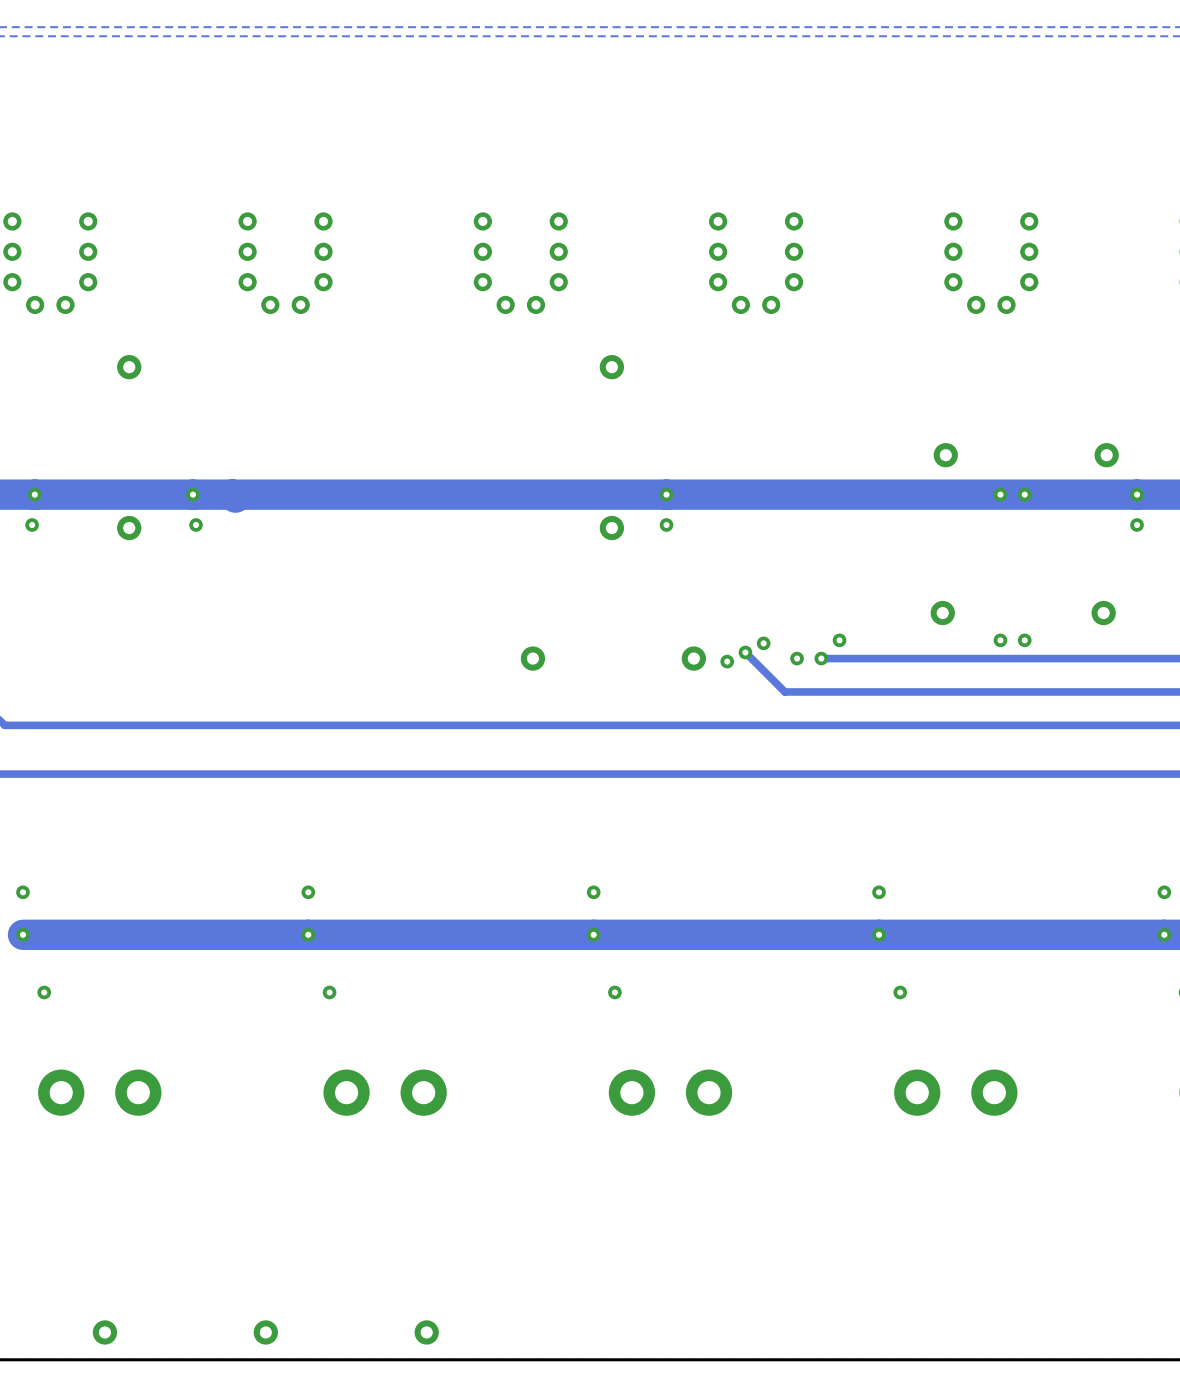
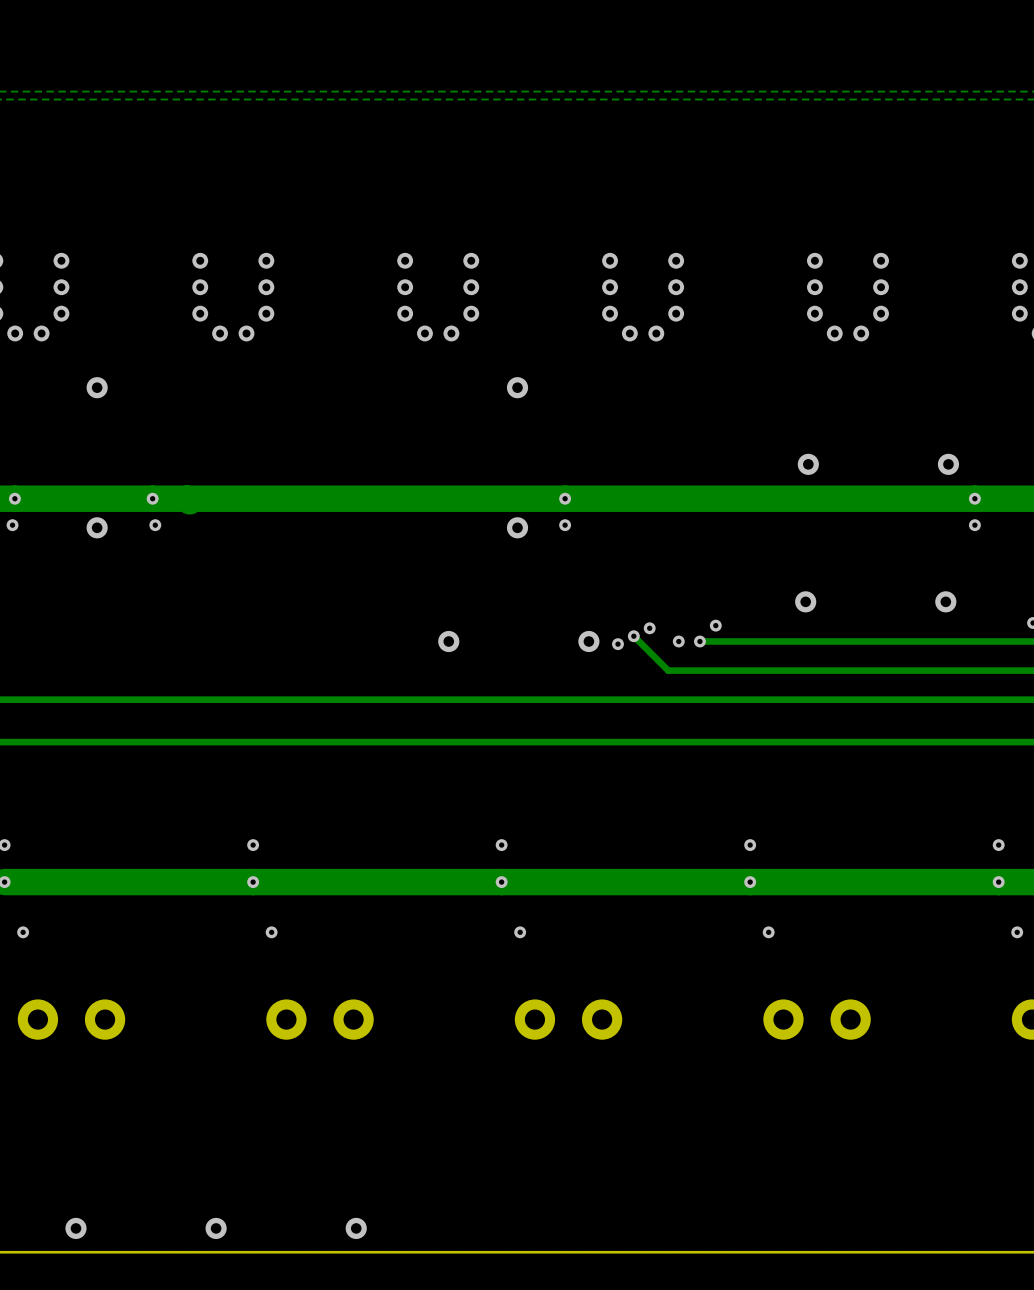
via: (1000, 494) -> none
via: (1024, 494) -> none
via: (1000, 640) -> none
via: (1024, 640) -> none

